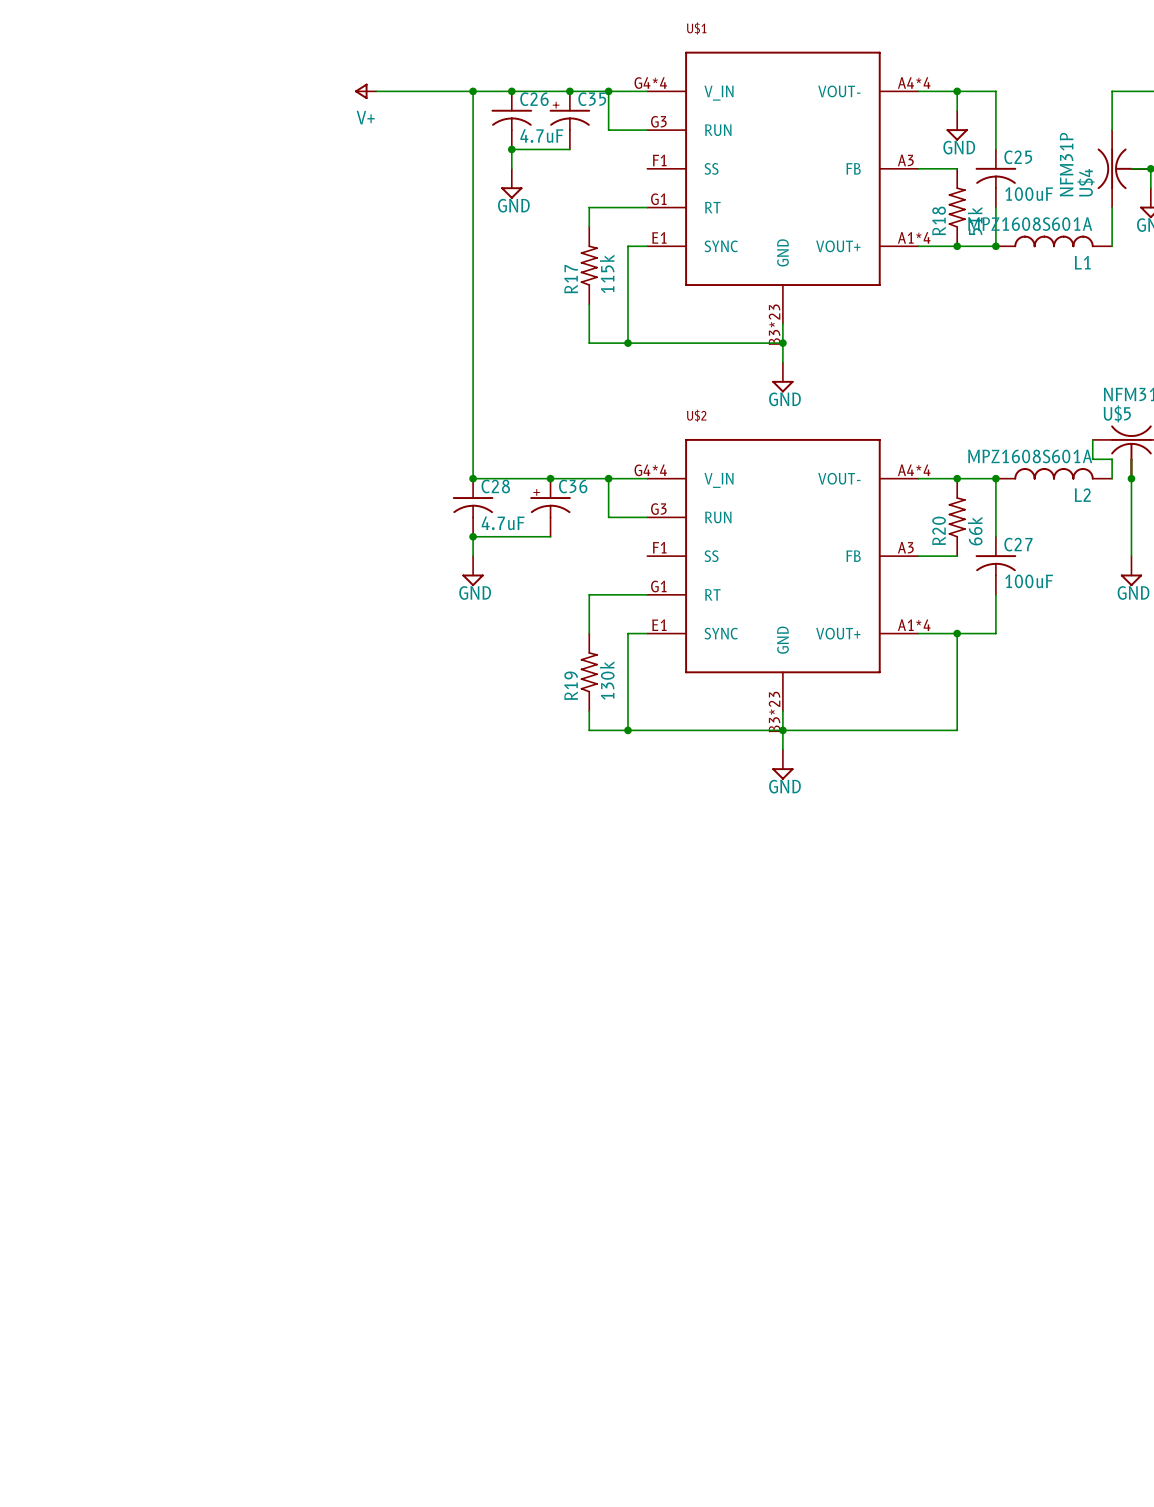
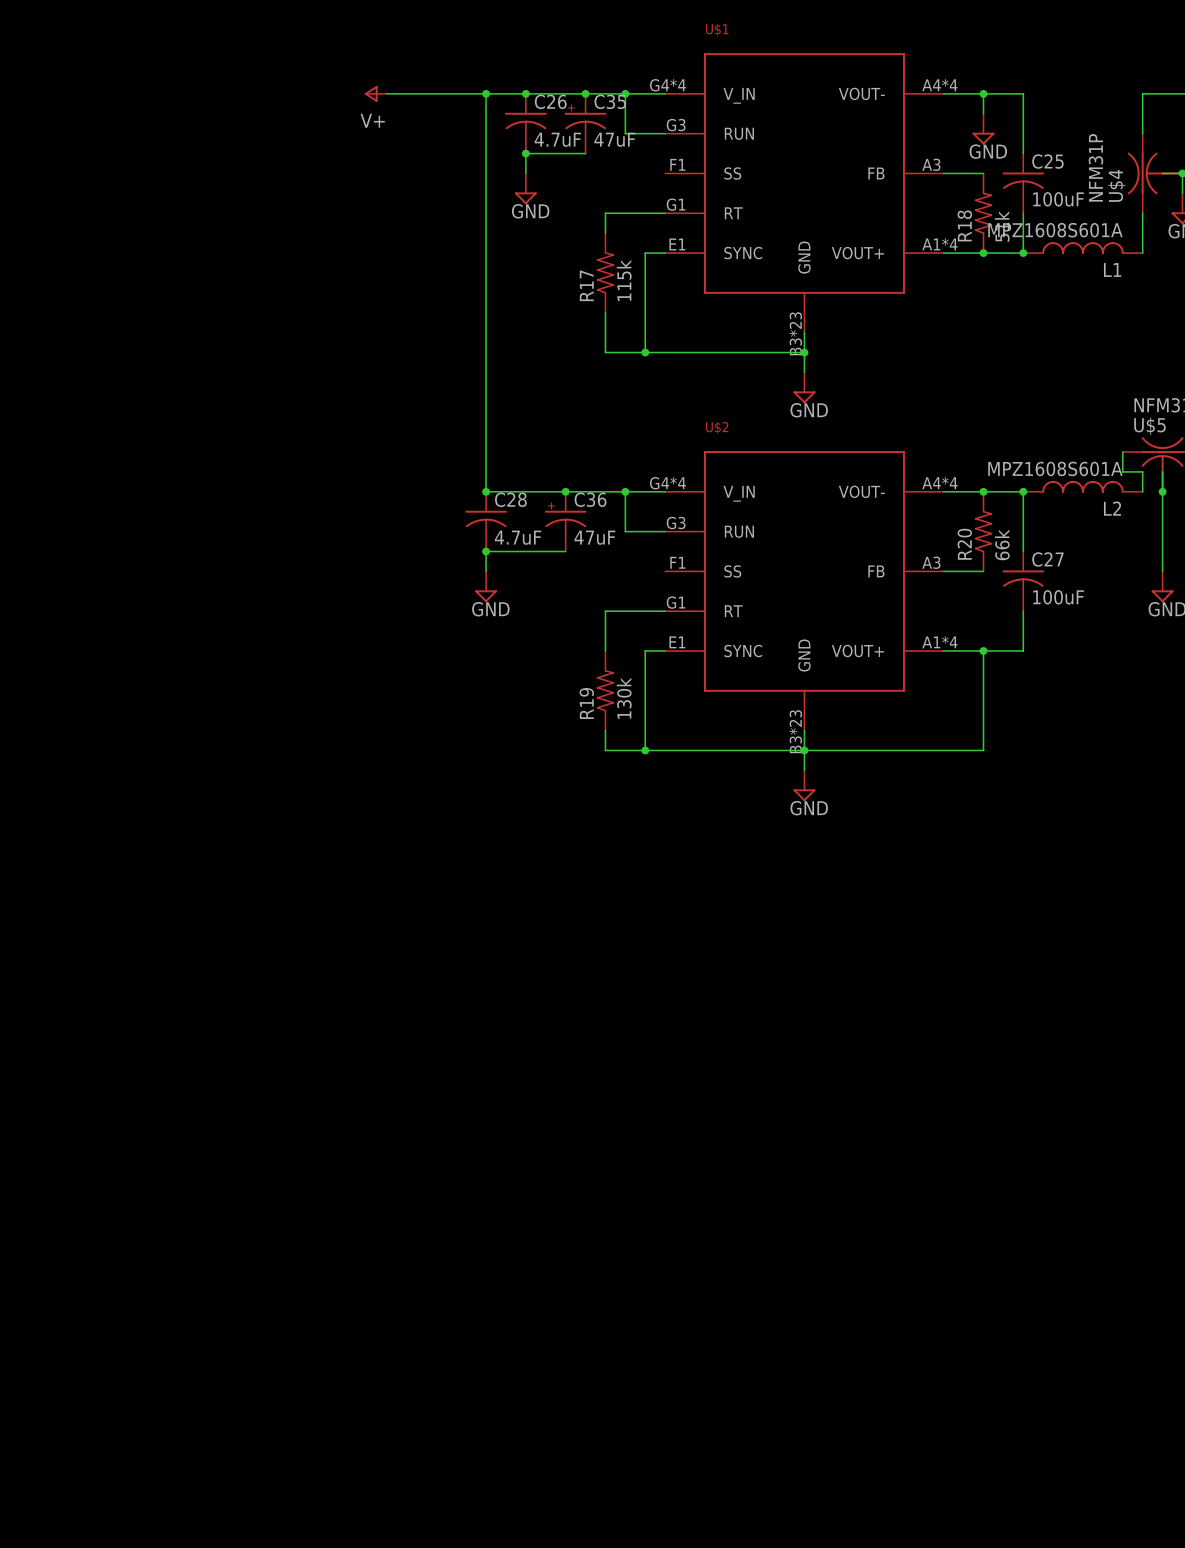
C35 value: none -> 47uF (614, 139)
C36 value: none -> 47uF (594, 537)

